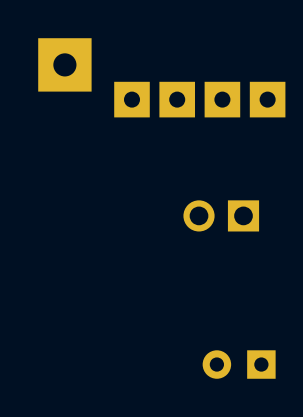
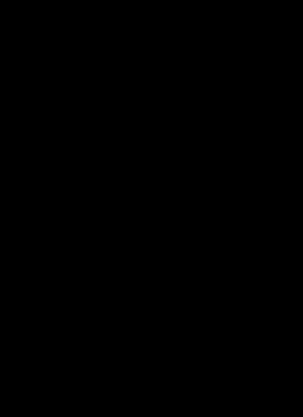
part: (64, 64) -> none
part: (199, 99) -> none
part: (221, 215) -> none
part: (239, 364) -> none

